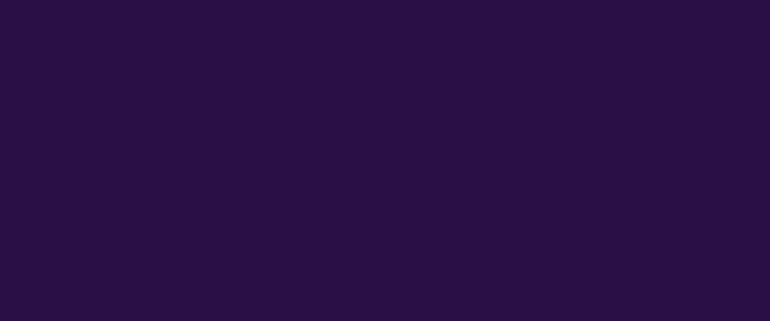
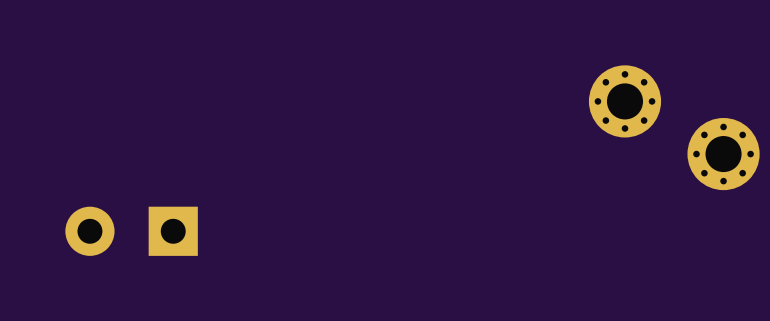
part: none -> (624, 101)
part: none -> (723, 154)
part: none -> (131, 231)

